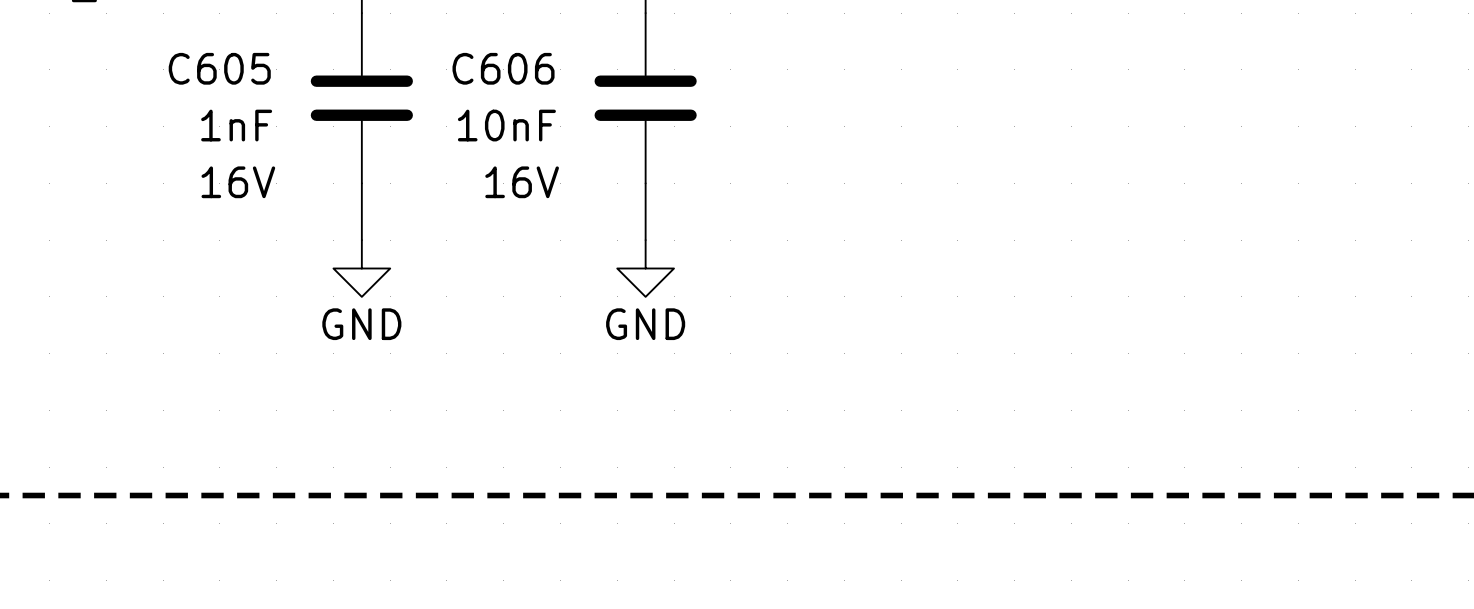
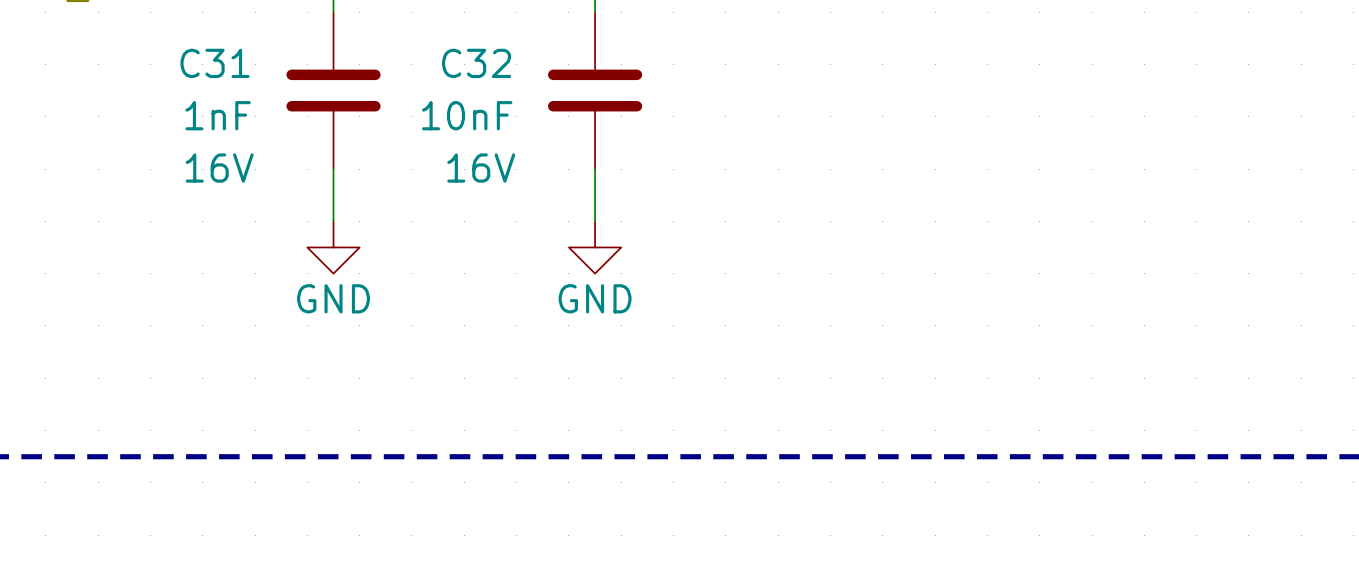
C605 name: C605 (219, 68) -> C31 (215, 63)
C606 name: C606 (503, 68) -> C32 (476, 63)

